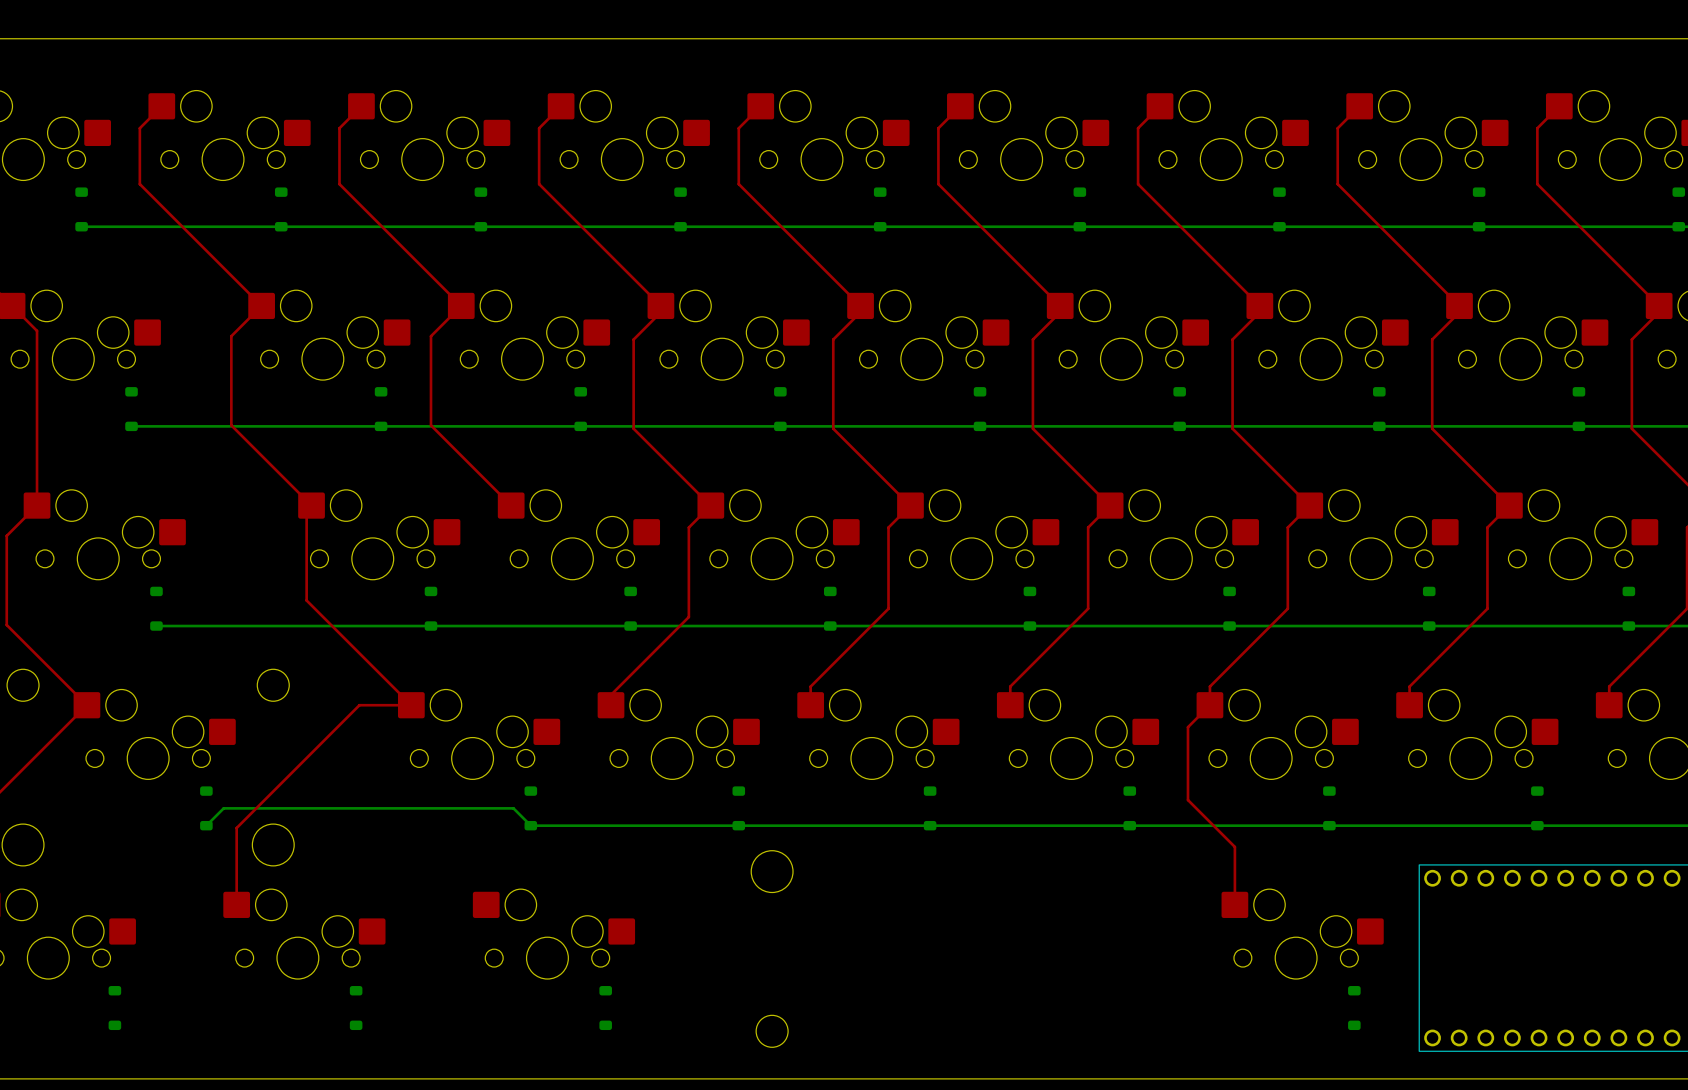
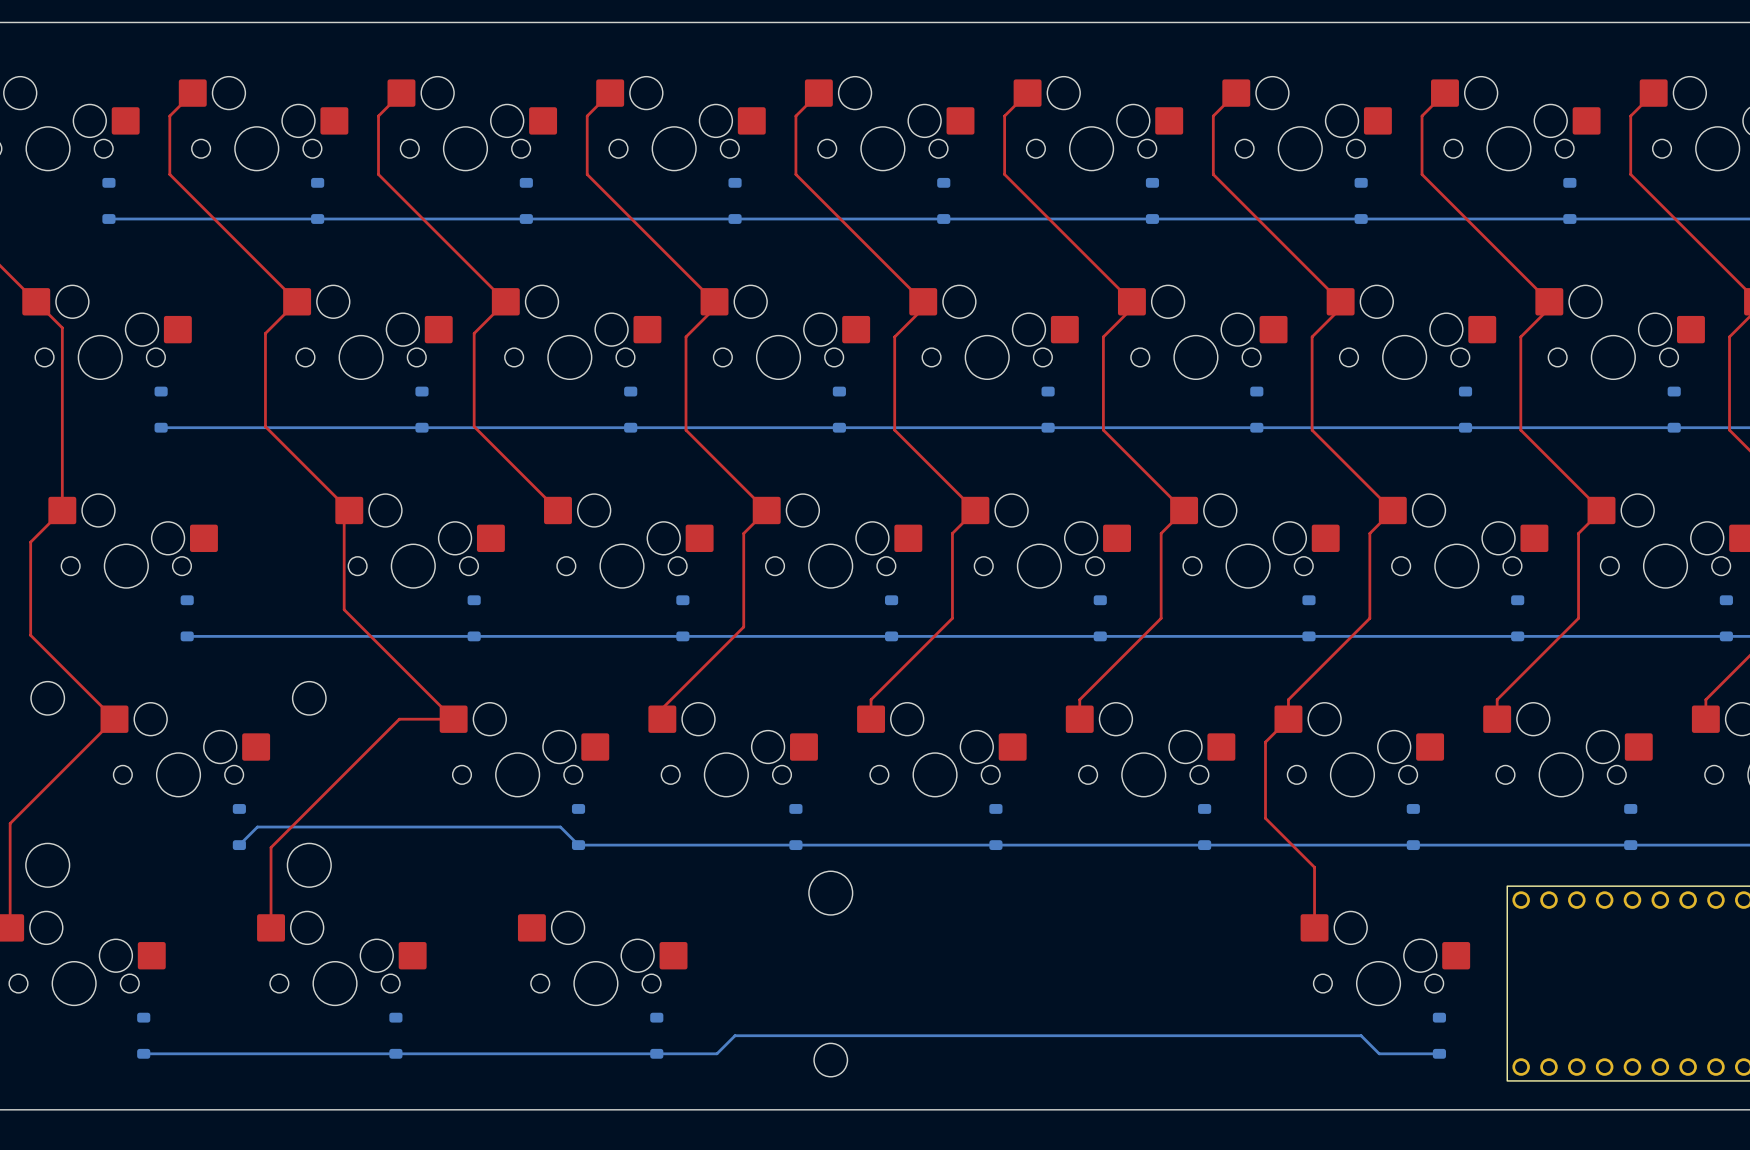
bottom track: none -> (143, 1053) (716, 1053) (735, 1035) (1361, 1035) (1379, 1053) (1439, 1053)

